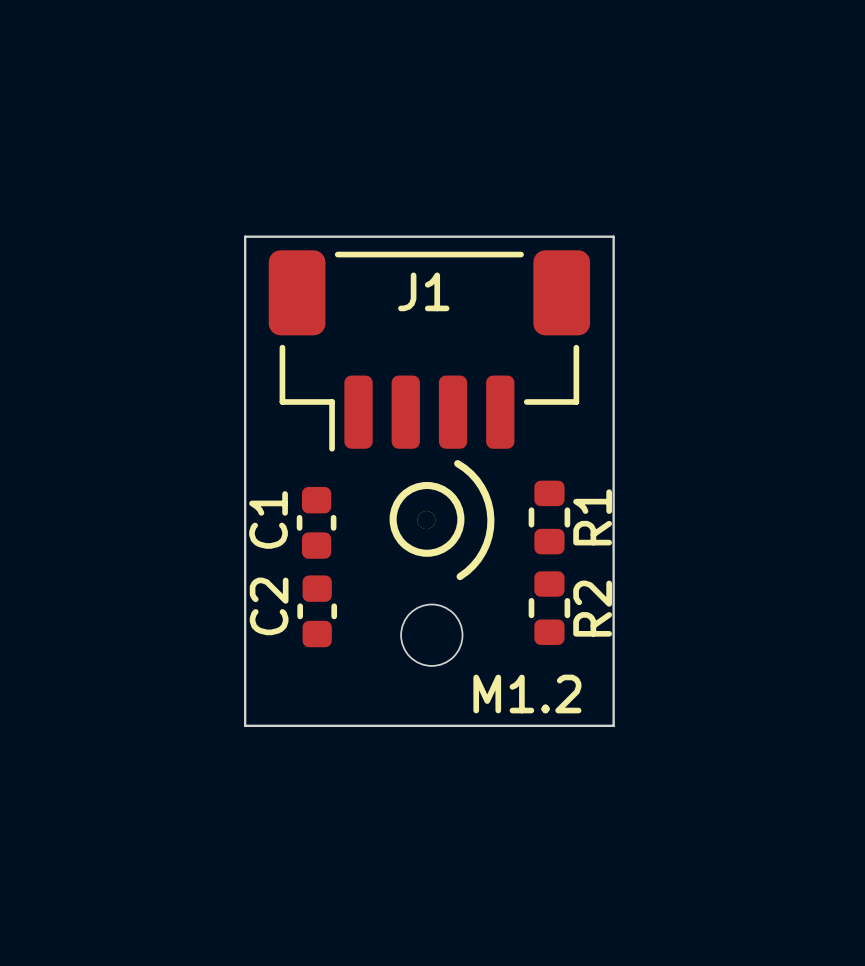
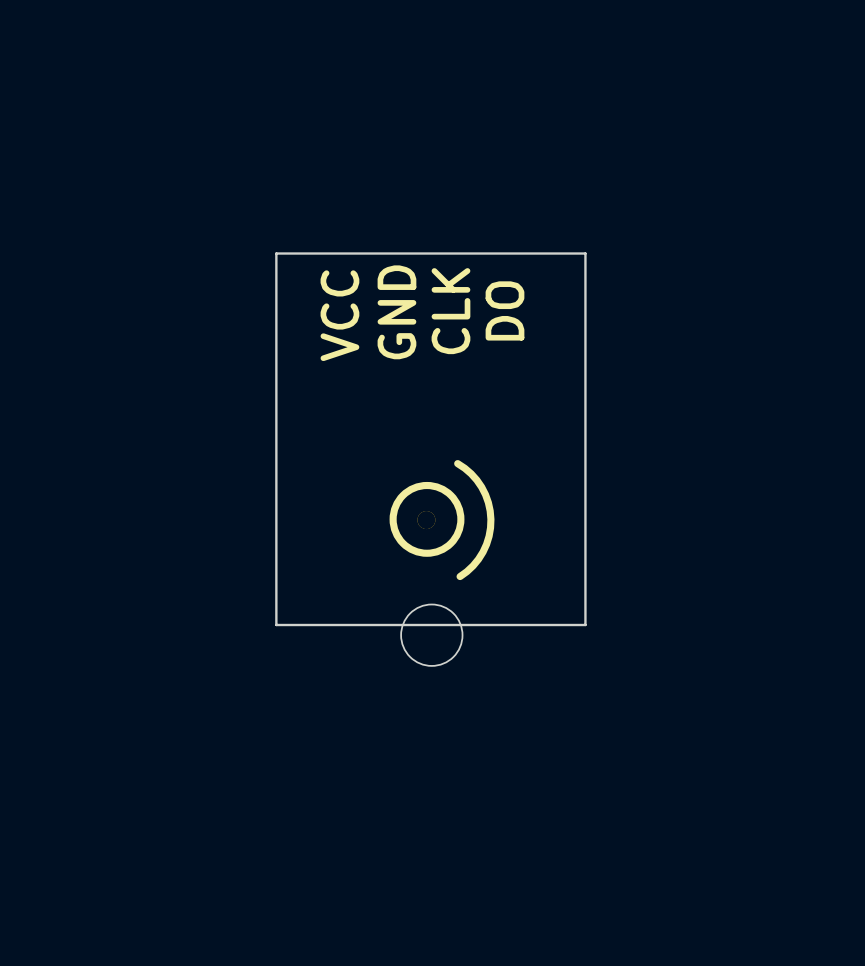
board edge: (245, 236) (245, 725) (613, 725) (613, 236) (245, 236) -> (276, 253) (276, 625) (585, 625) (585, 253) (276, 253)
text: none -> DO (504, 310)
text: none -> CLK (450, 311)
text: none -> GND (396, 312)
text: none -> VCC (339, 315)
J1: (429, 350) -> none
R1: (549, 517) -> none
C1: (316, 522) -> none
R2: (549, 608) -> none
C2: (317, 611) -> none
text: M1.2 (527, 693) -> none

